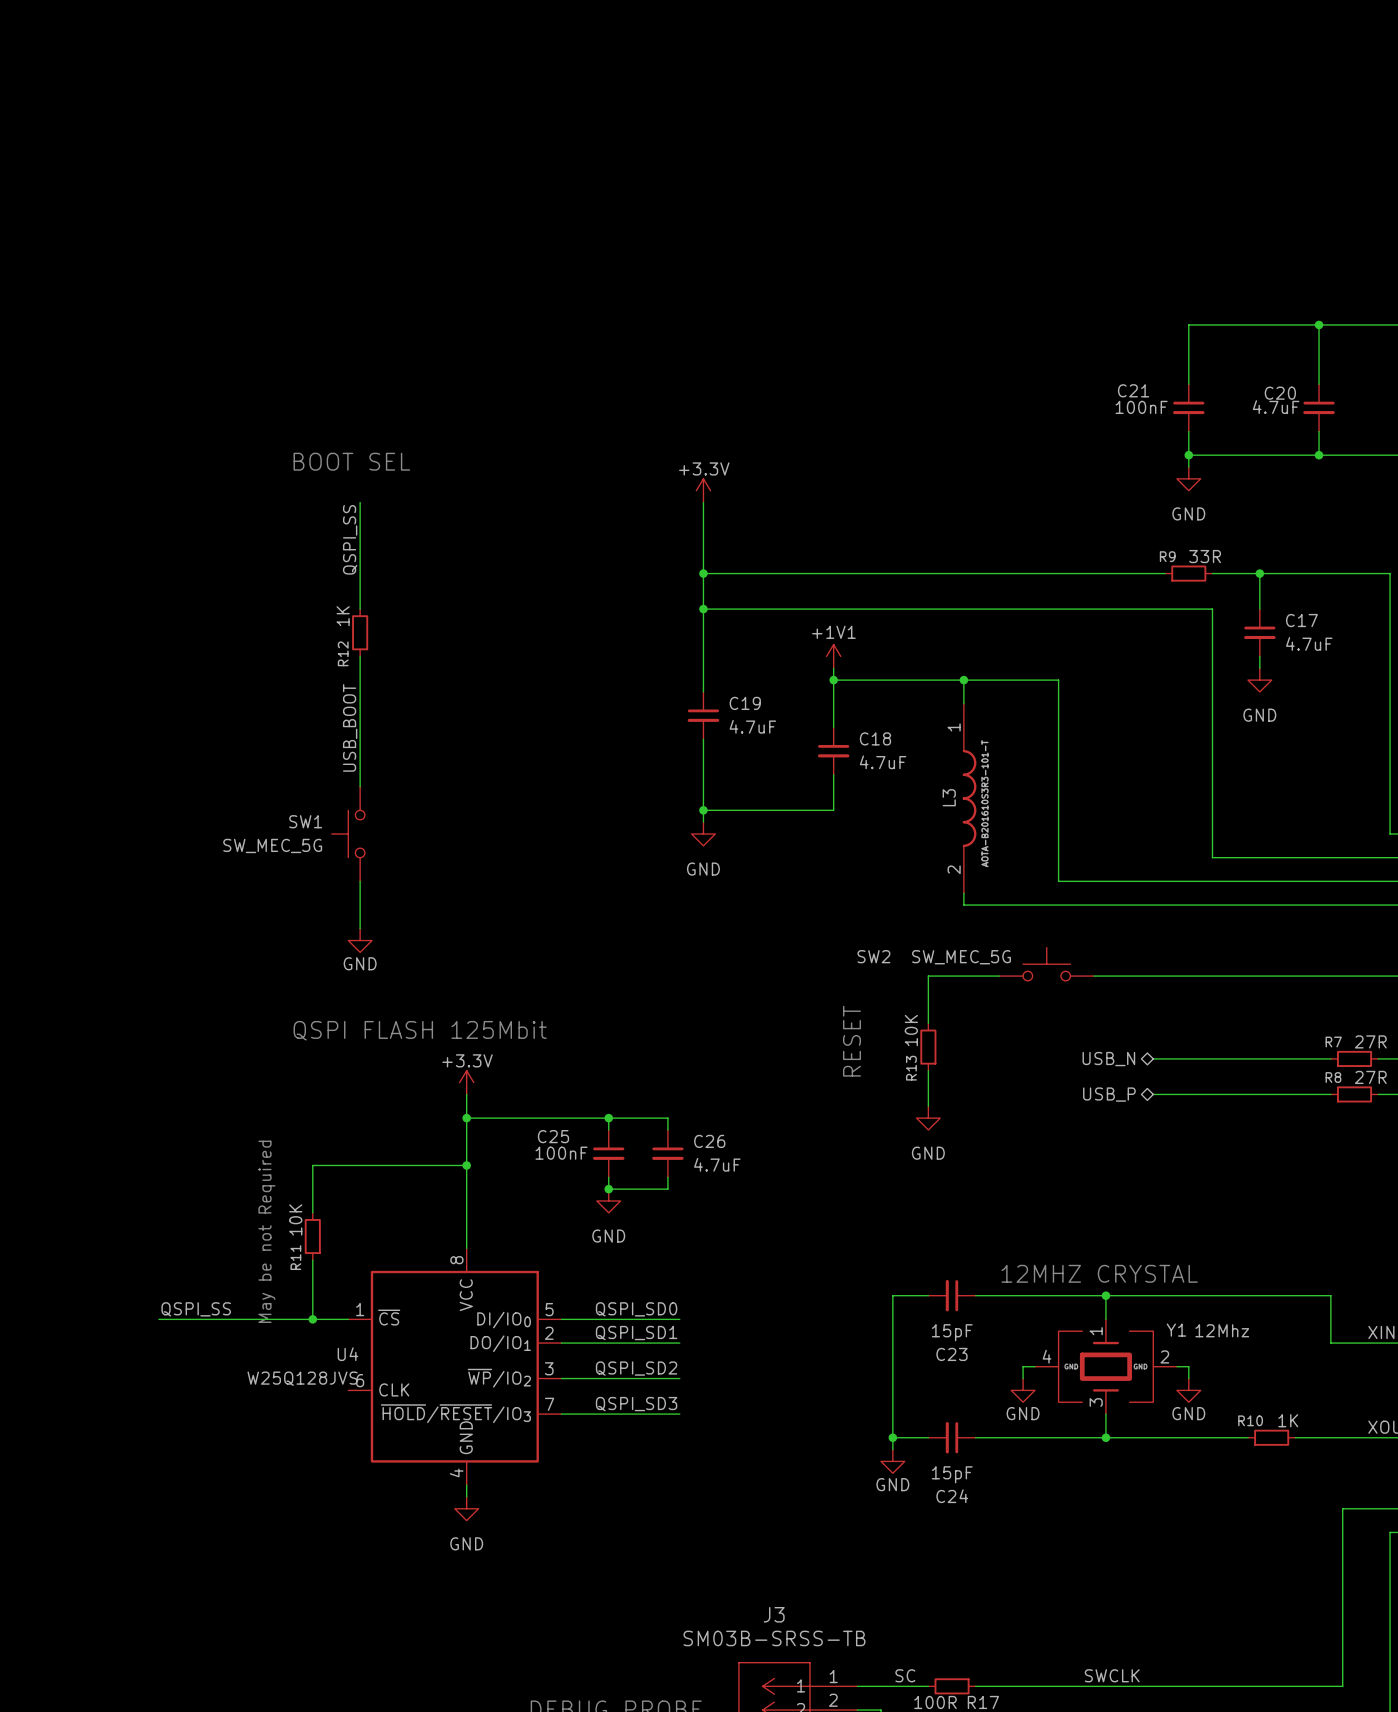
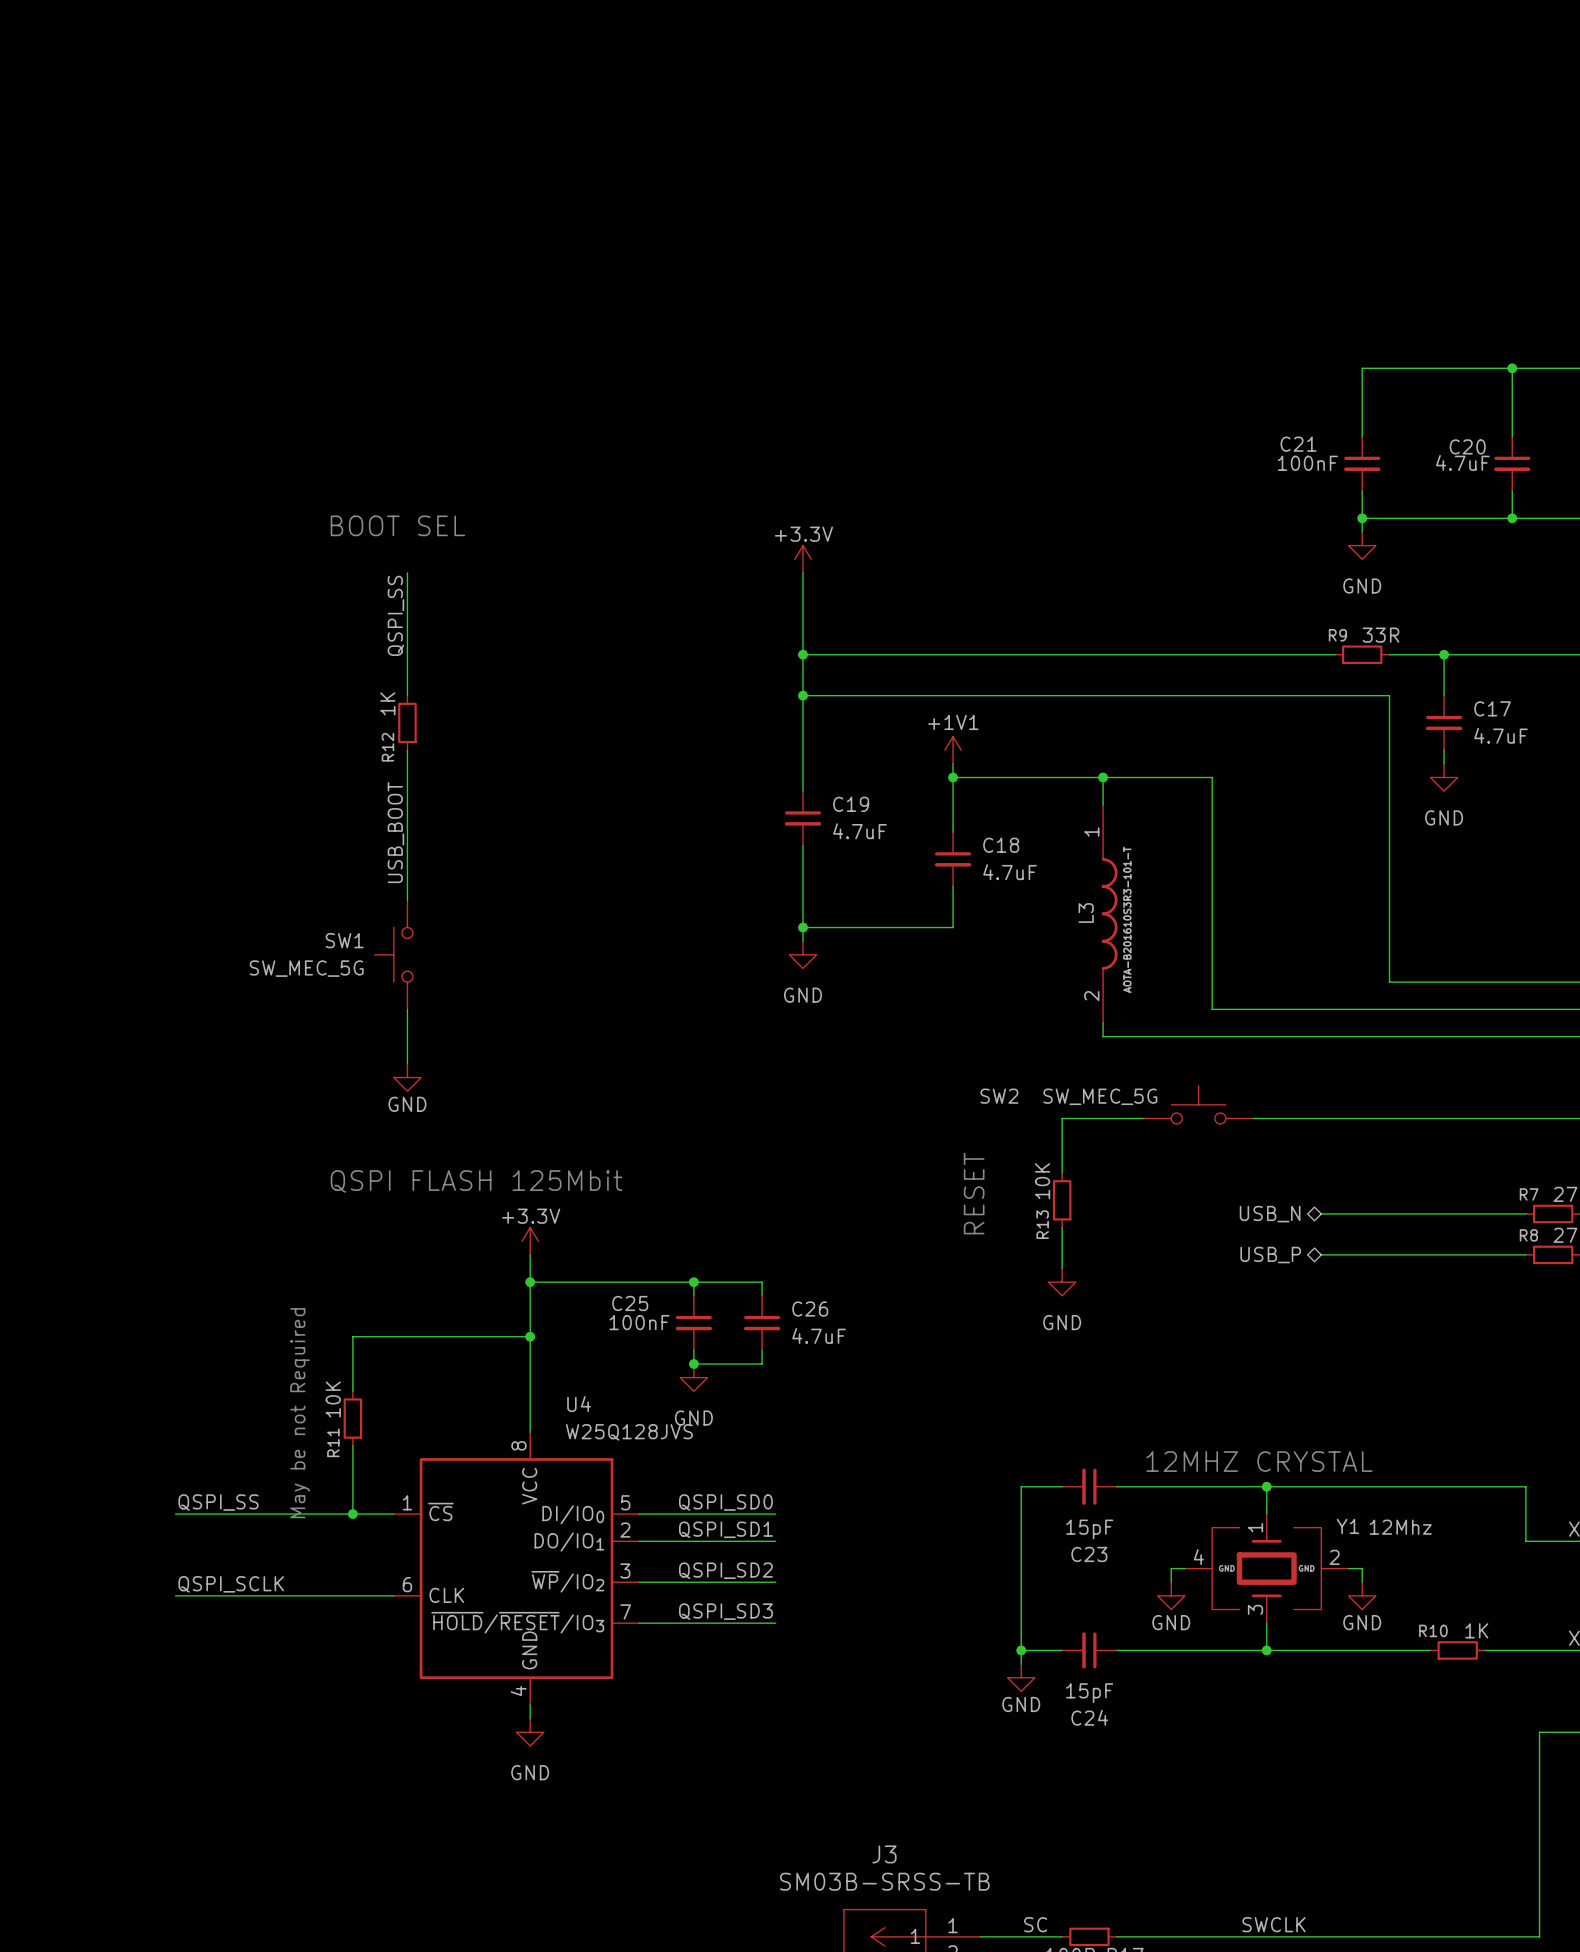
U4 name position: U4 (347, 1354) -> U4 (579, 1404)
U4 value position: W25Q128JVS (302, 1378) -> W25Q128JVS (629, 1432)
label: none -> QSPI_SCLK (231, 1584)
wire: none -> (175, 1595) (393, 1595)

